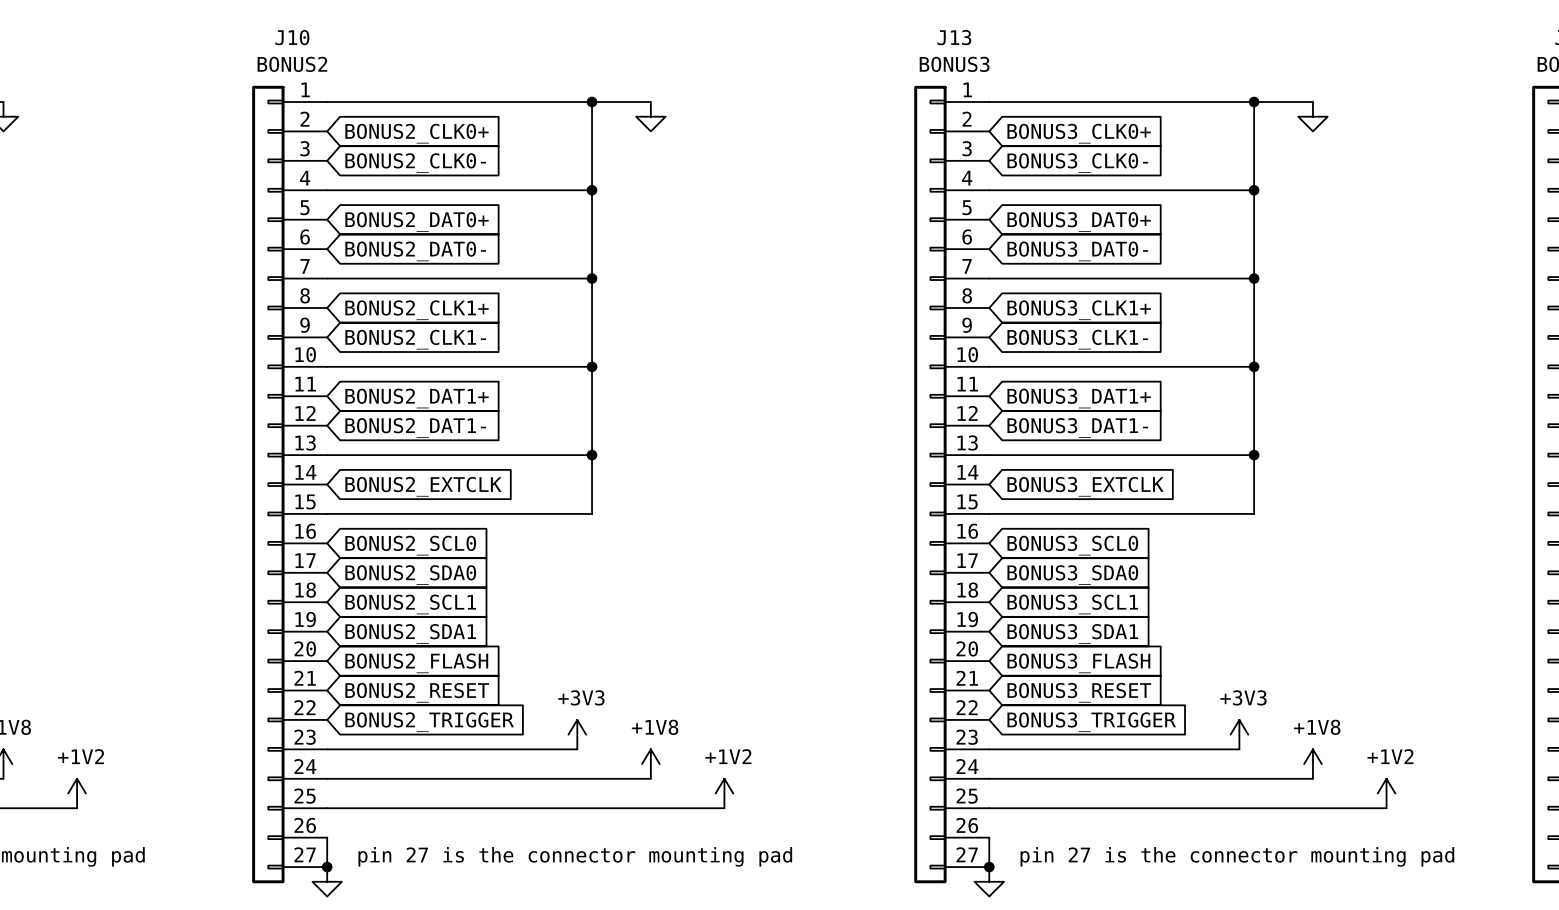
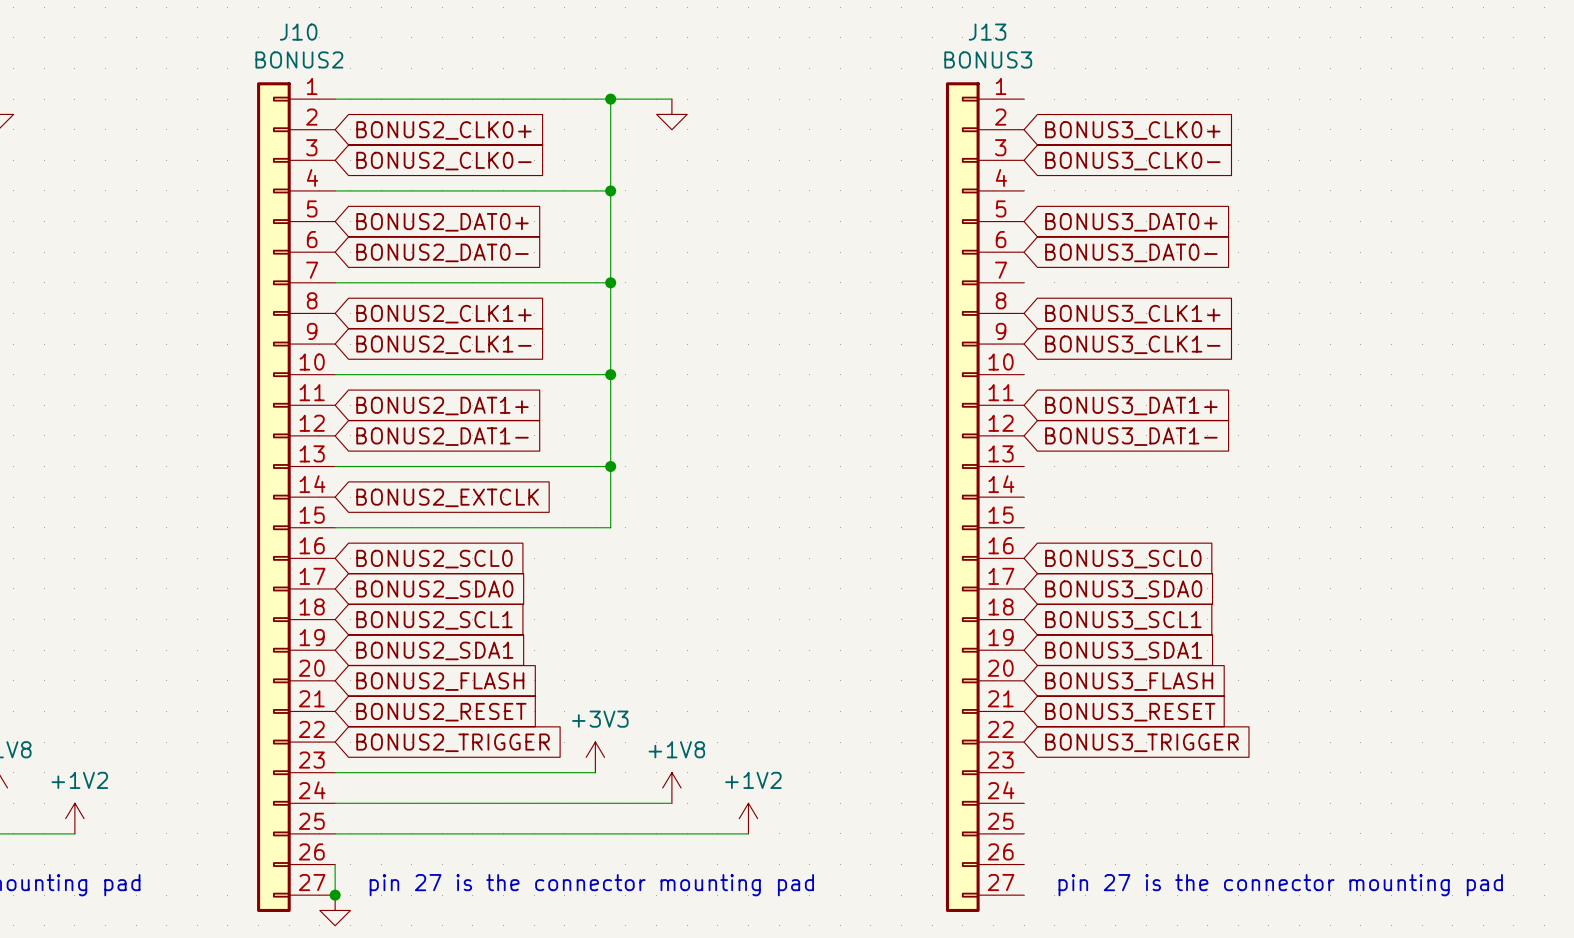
wire: (989, 101) (1312, 101) -> none
wire: (1254, 101) (1254, 513) (989, 513) -> none
junction: (1254, 101) -> none
power symbol: (1312, 116) -> none
wire: (989, 190) (1254, 190) -> none
junction: (1254, 190) -> none
wire: (989, 278) (1254, 278) -> none
junction: (1254, 278) -> none
wire: (989, 366) (1254, 366) -> none
junction: (1254, 366) -> none
wire: (989, 455) (1254, 455) -> none
junction: (1254, 455) -> none
global label: BONUS3_EXTCLK (1085, 486) -> none
power symbol: +3V3 (1239, 734) -> none
wire: (989, 749) (1239, 749) -> none
power symbol: +1V8 (1312, 764) -> none
wire: (989, 778) (1312, 778) -> none
power symbol: +1V2 (1386, 793) -> none
wire: (989, 808) (1386, 808) -> none
wire: (989, 837) (989, 867) -> none
junction: (989, 867) -> none
power symbol: (989, 881) -> none

